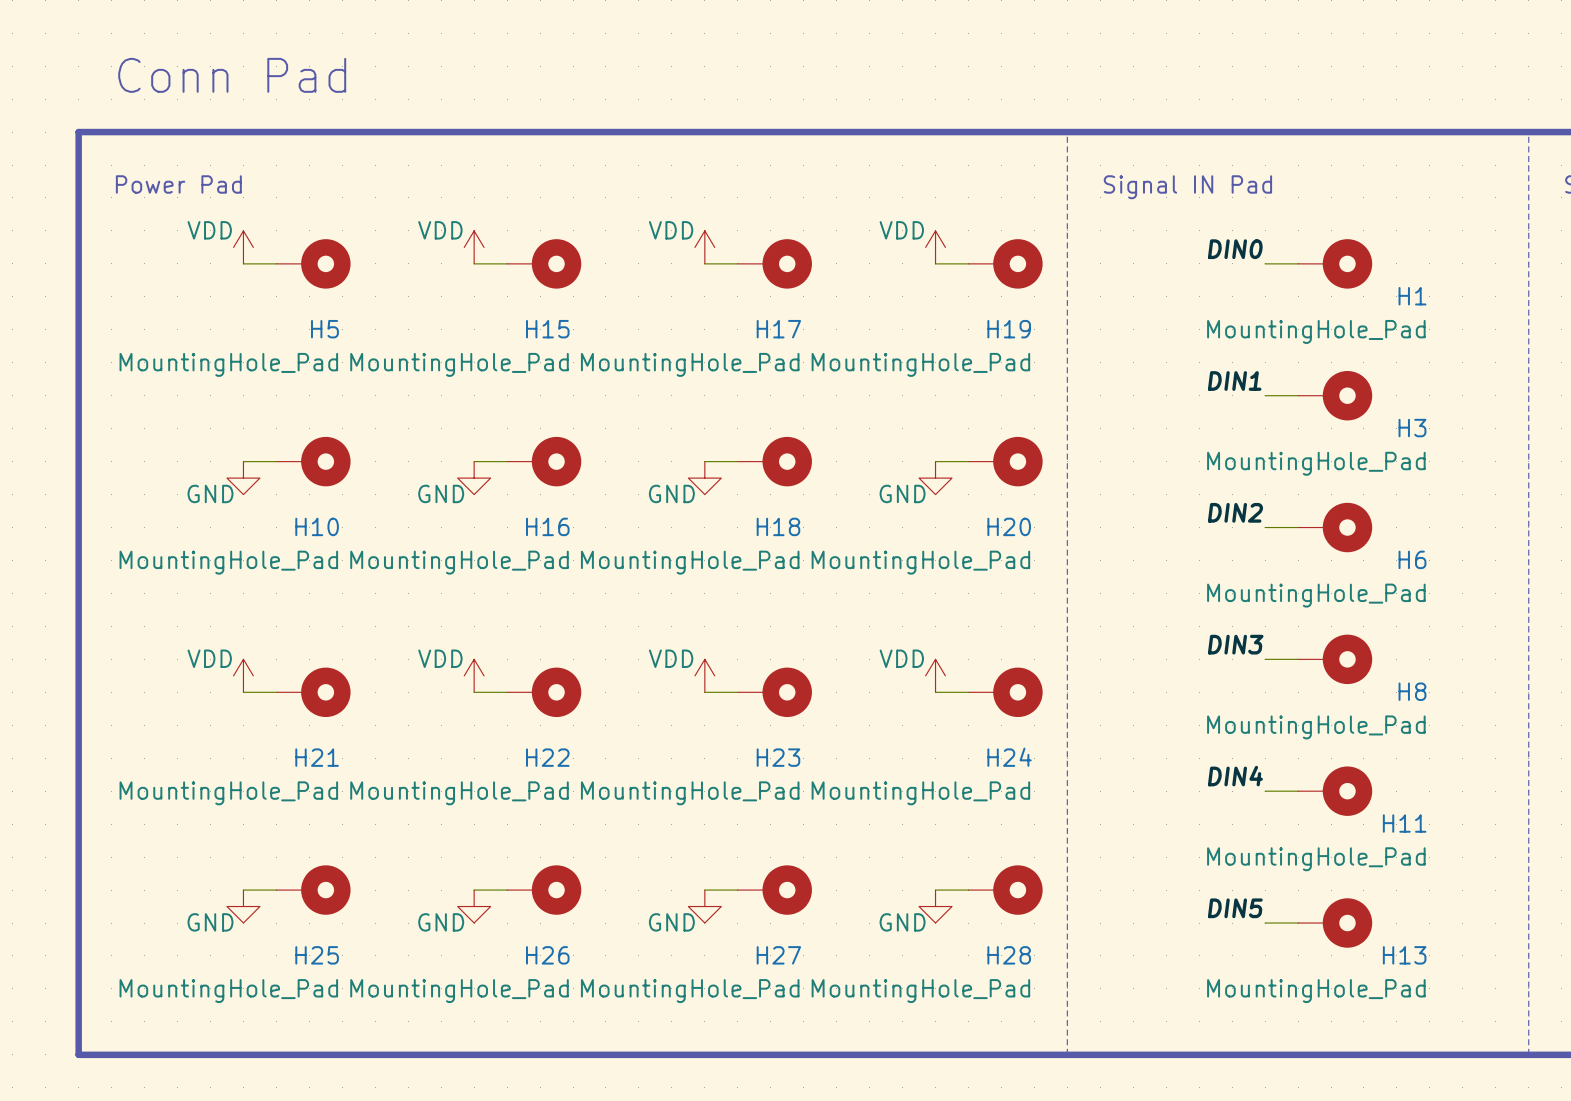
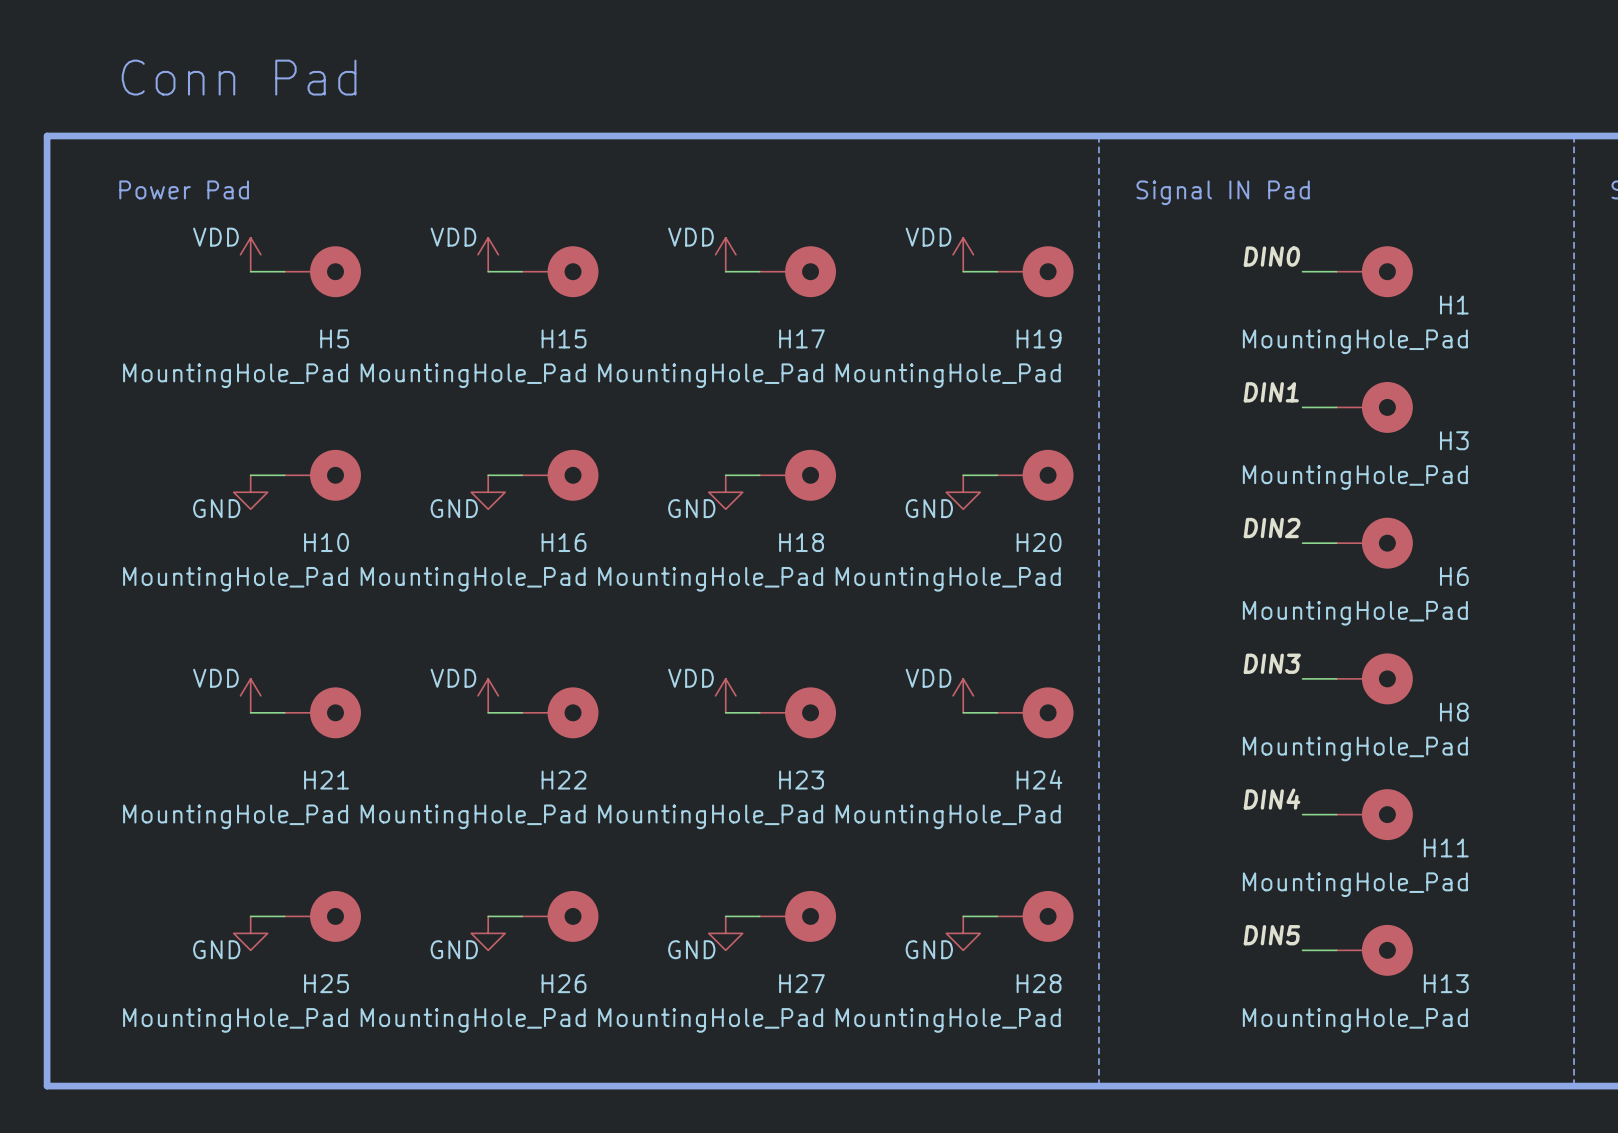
line: (78, 132) (78, 1054) -> (81, 135) (47, 135) (47, 1086) (81, 1086)

